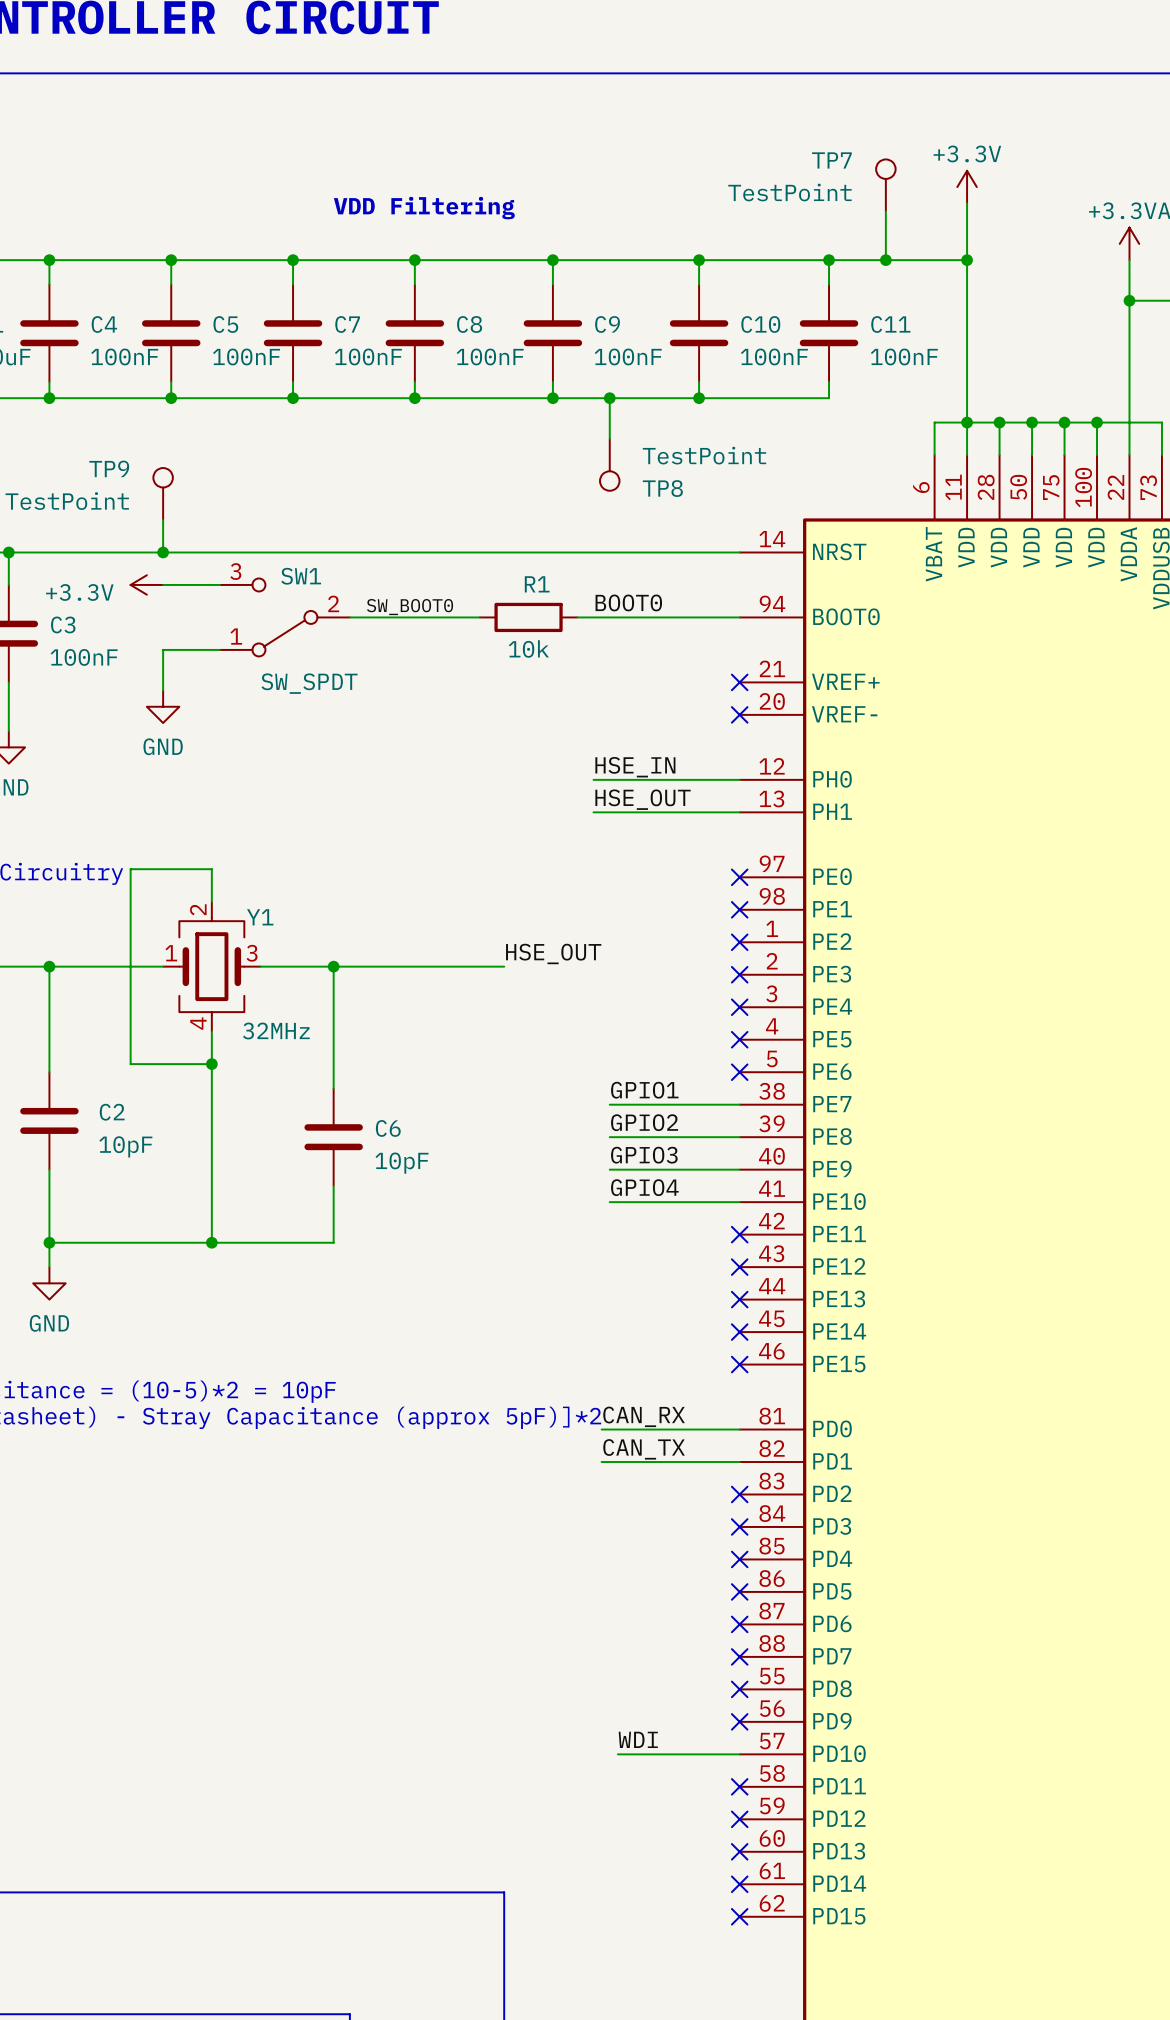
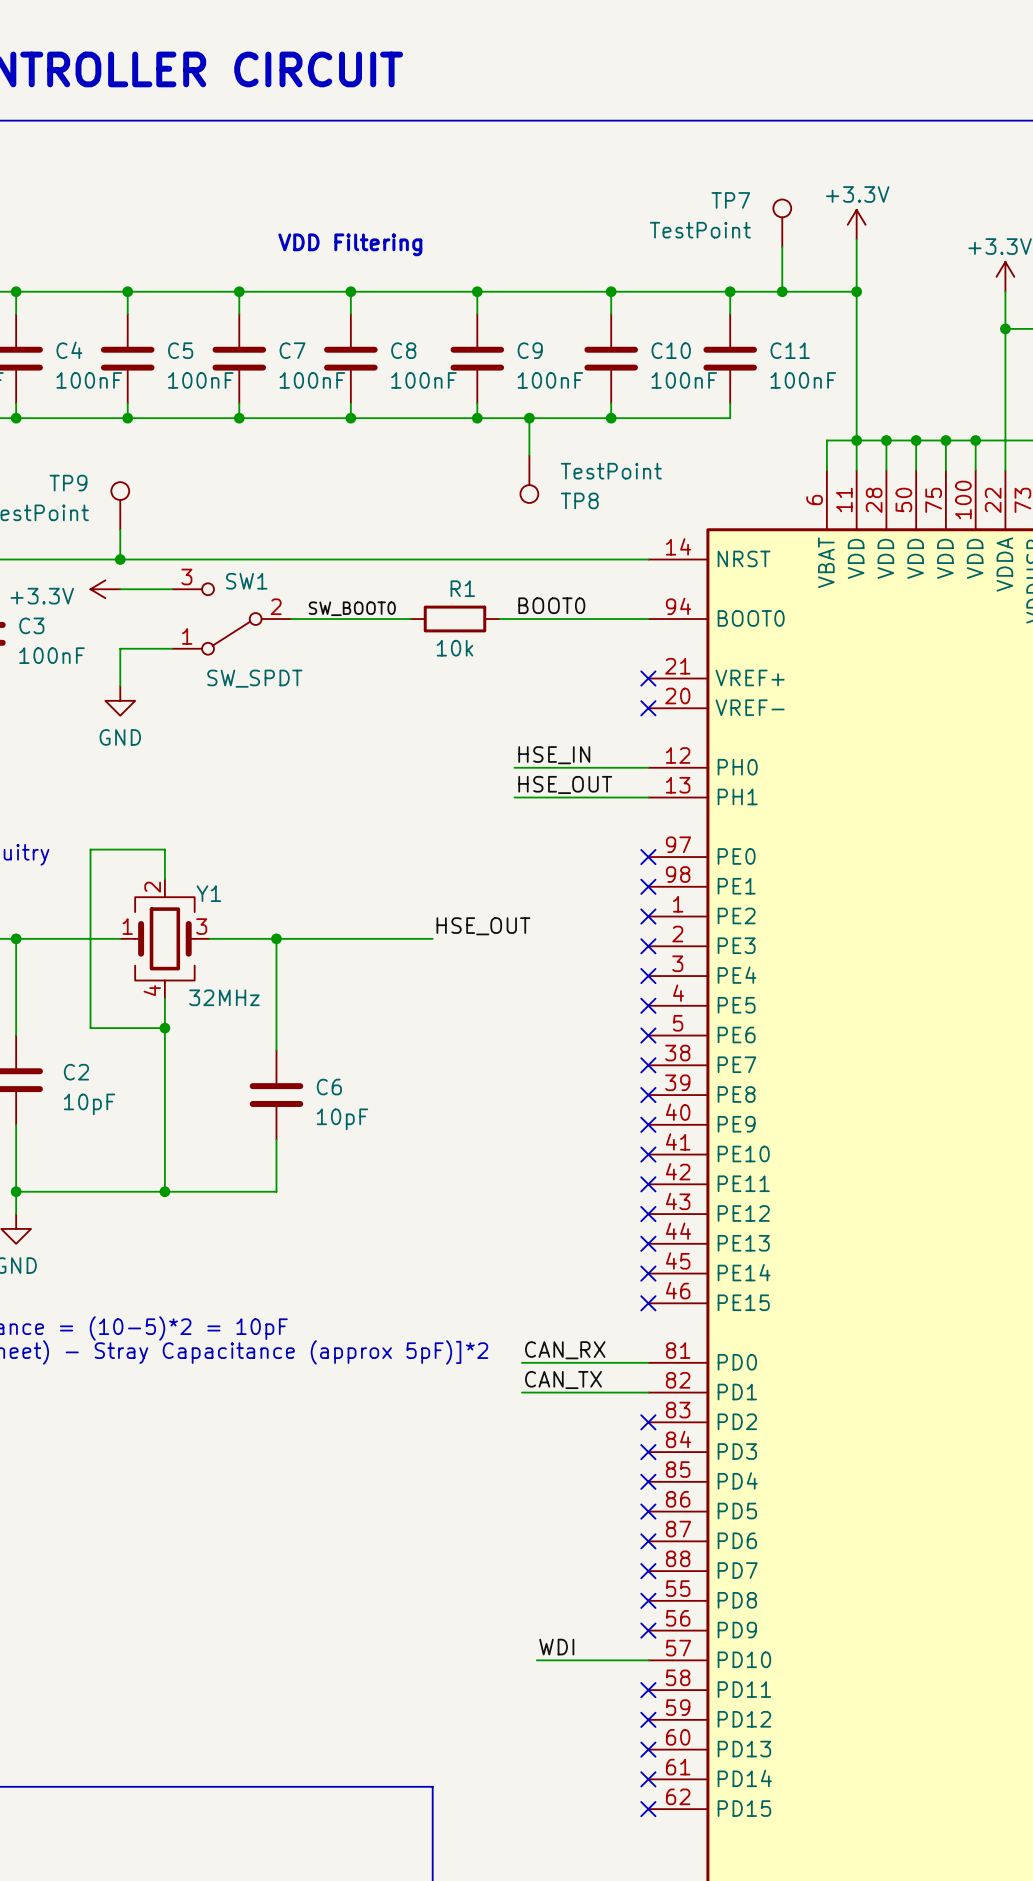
label: GPIO1 (644, 1090) -> none
wire: (609, 1104) (739, 1104) -> none
no-connect mark: none -> (648, 1065)
label: GPIO2 (644, 1122) -> none
wire: (609, 1137) (739, 1137) -> none
no-connect mark: none -> (648, 1095)
label: GPIO3 (644, 1155) -> none
wire: (609, 1169) (739, 1169) -> none
no-connect mark: none -> (648, 1124)
label: GPIO4 (644, 1187) -> none
wire: (609, 1202) (739, 1202) -> none
no-connect mark: none -> (648, 1154)

